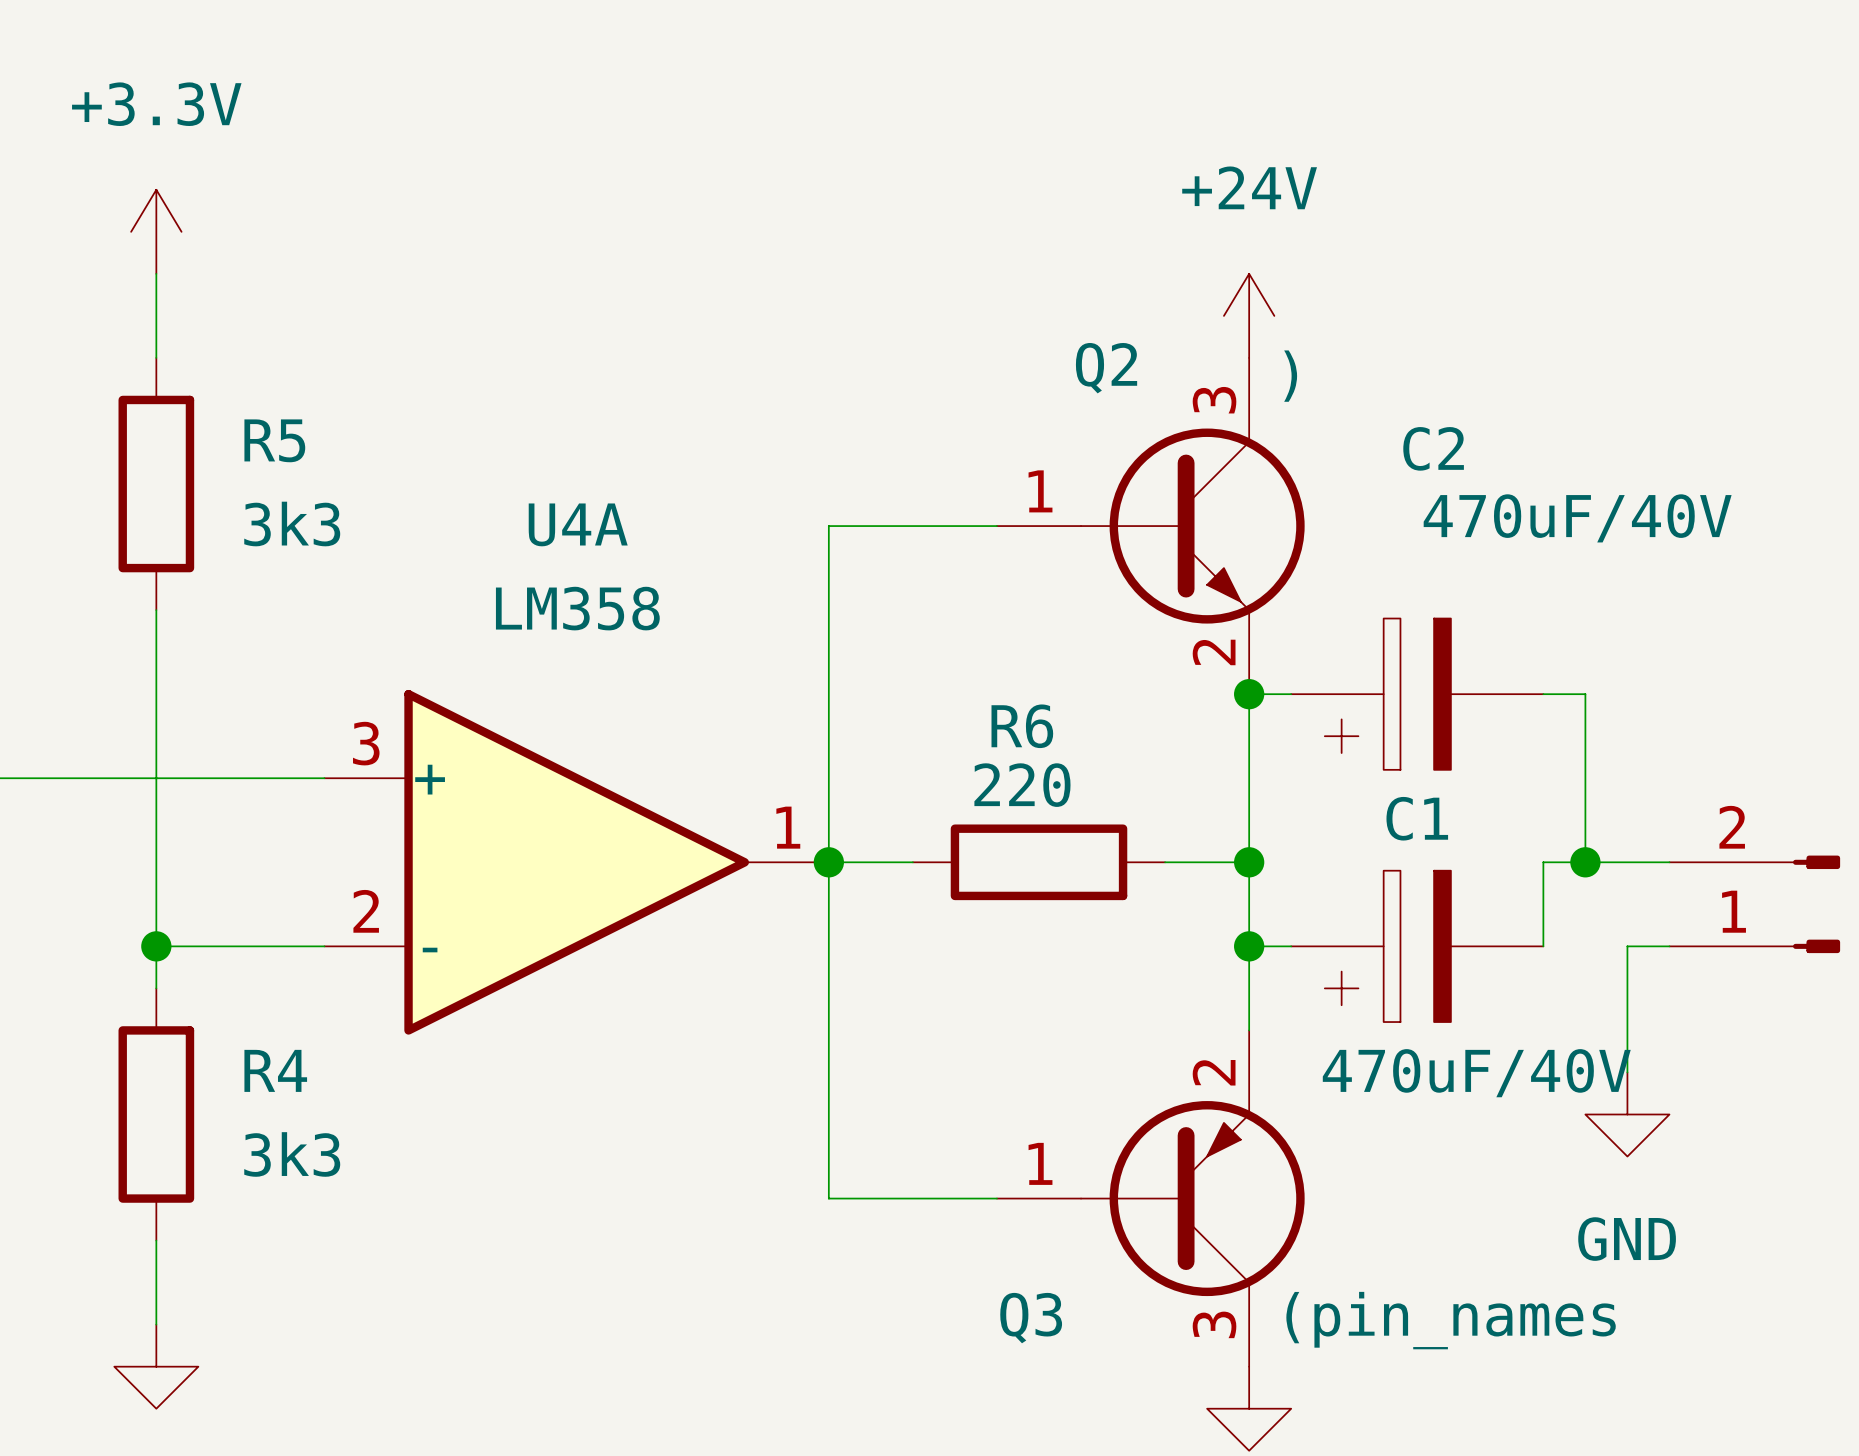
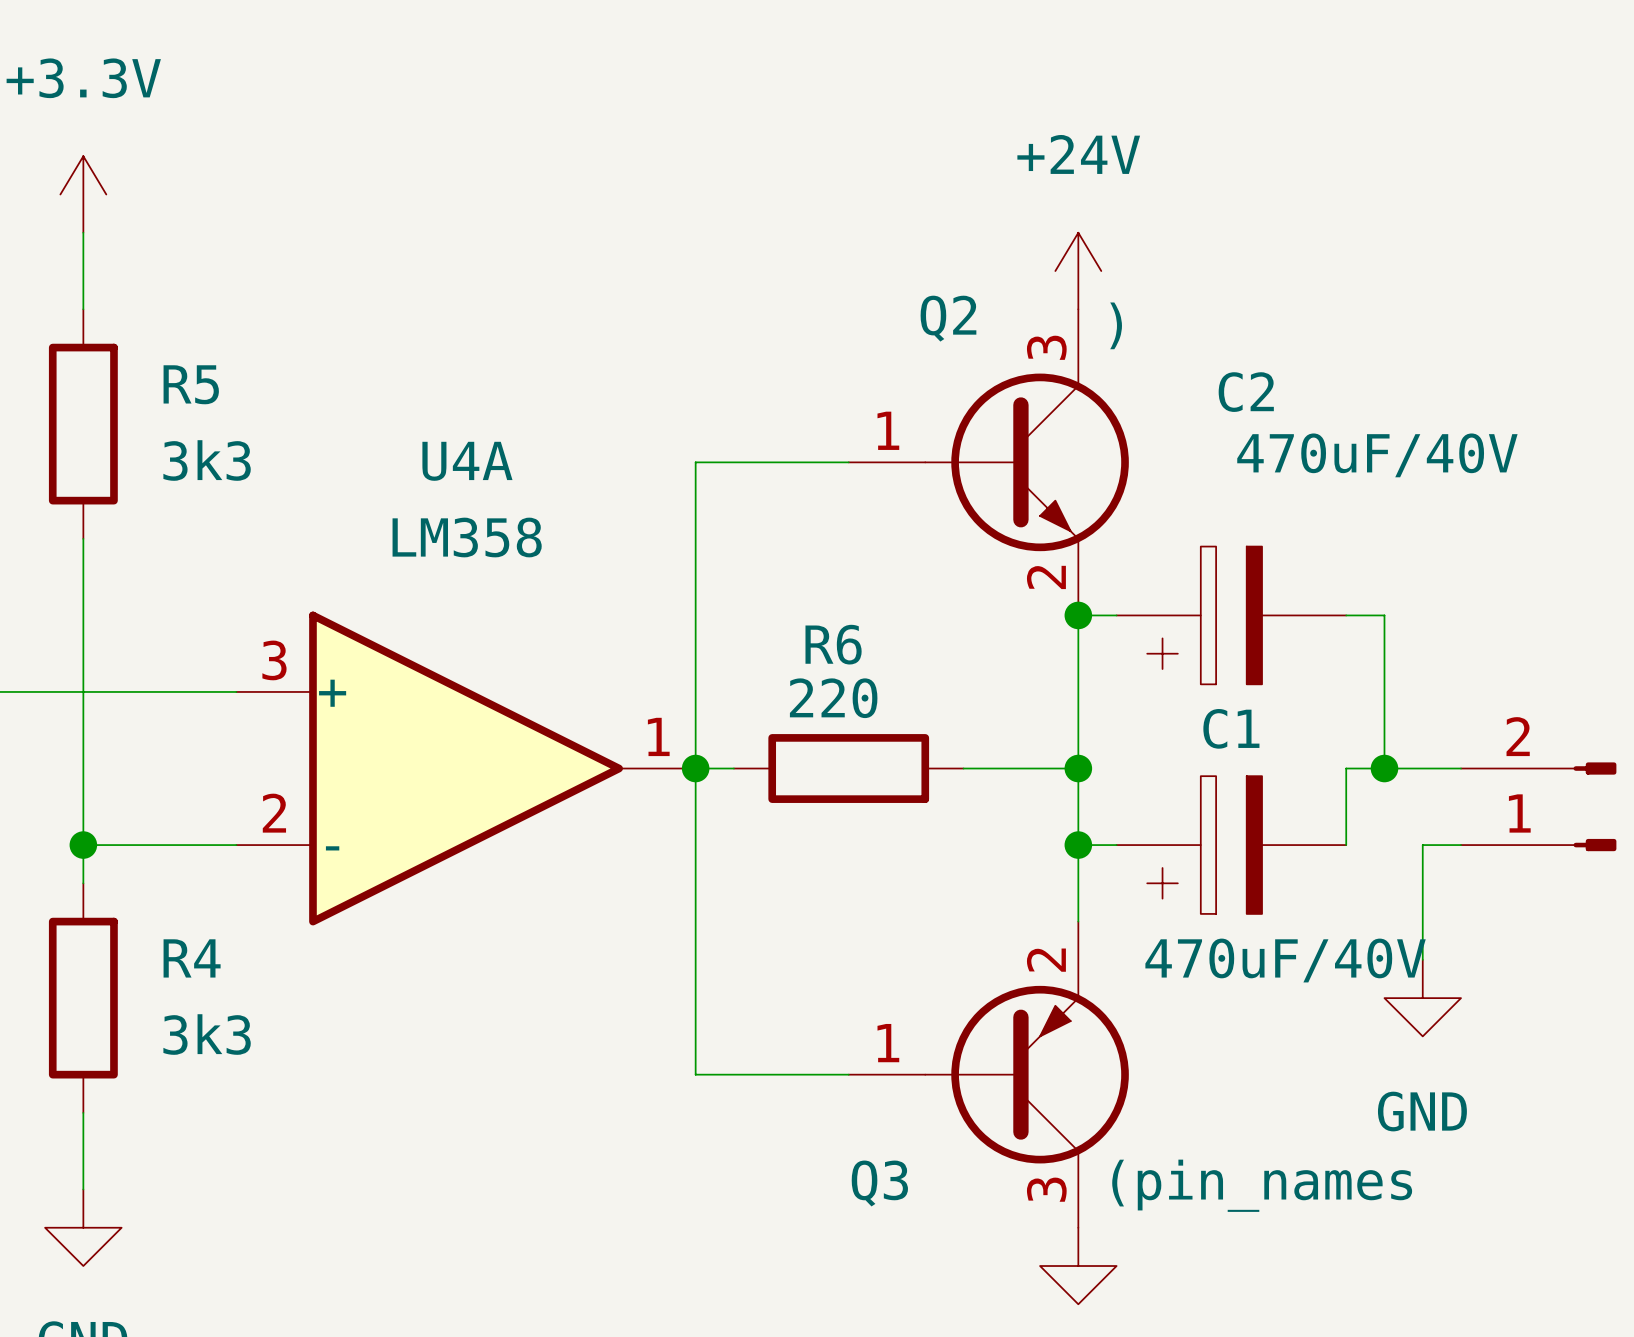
R6 position: (1039, 862) -> (848, 768)

